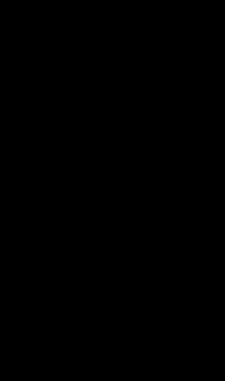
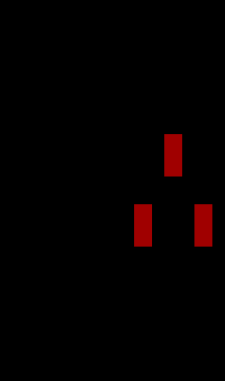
part: none -> (173, 190)

